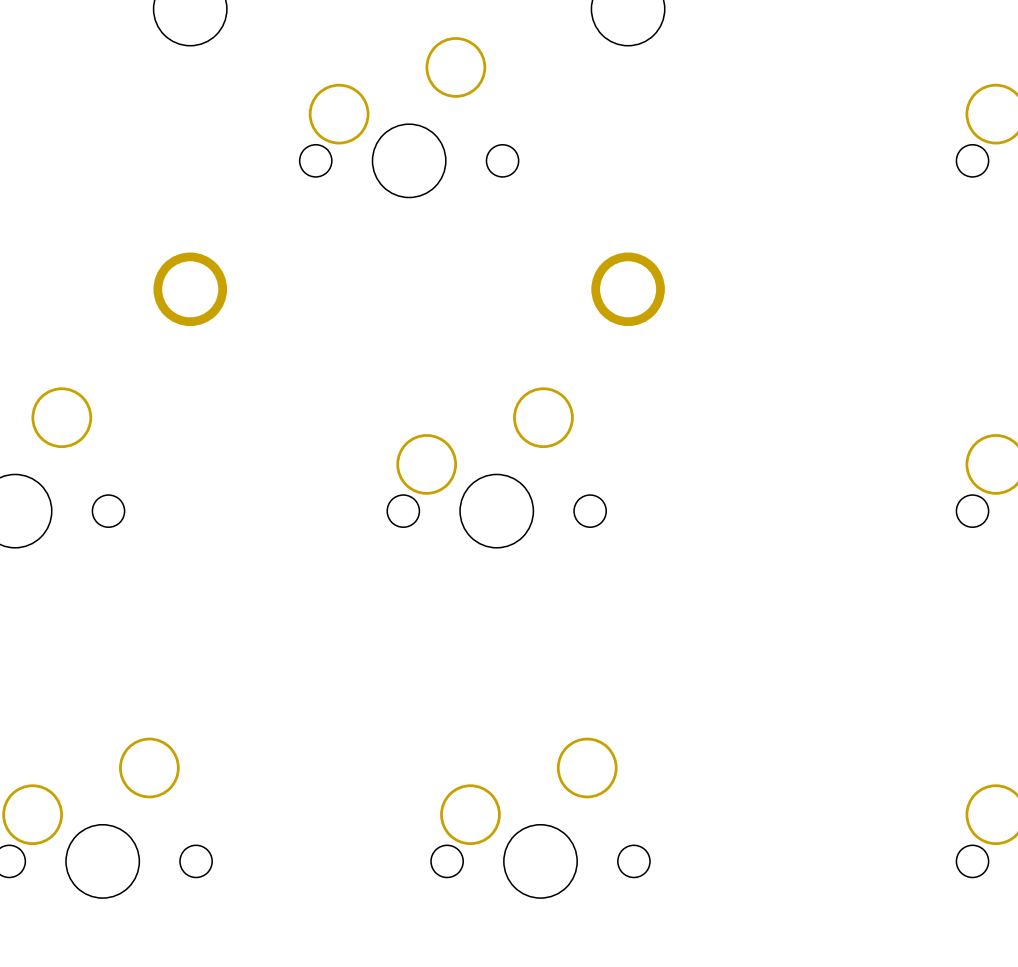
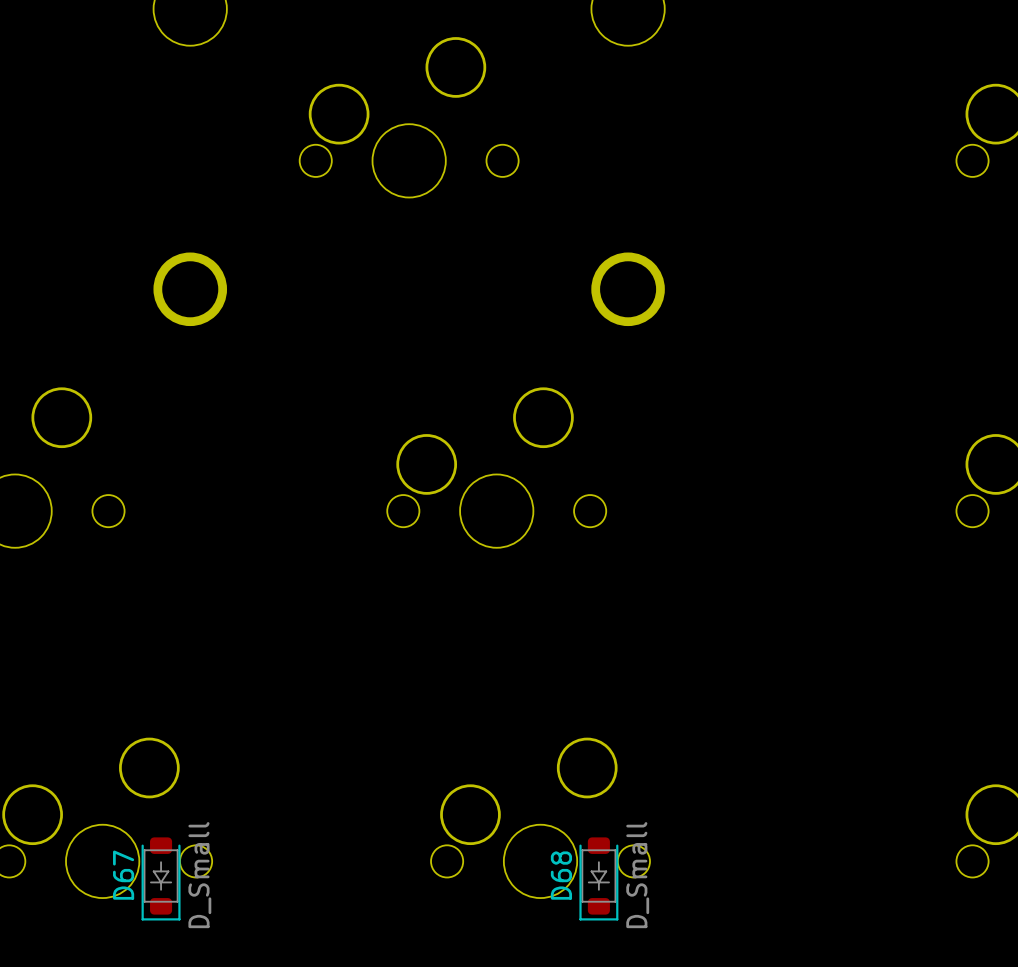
D67: none -> D_Small (161, 878)
D68: none -> D_Small (598, 878)

